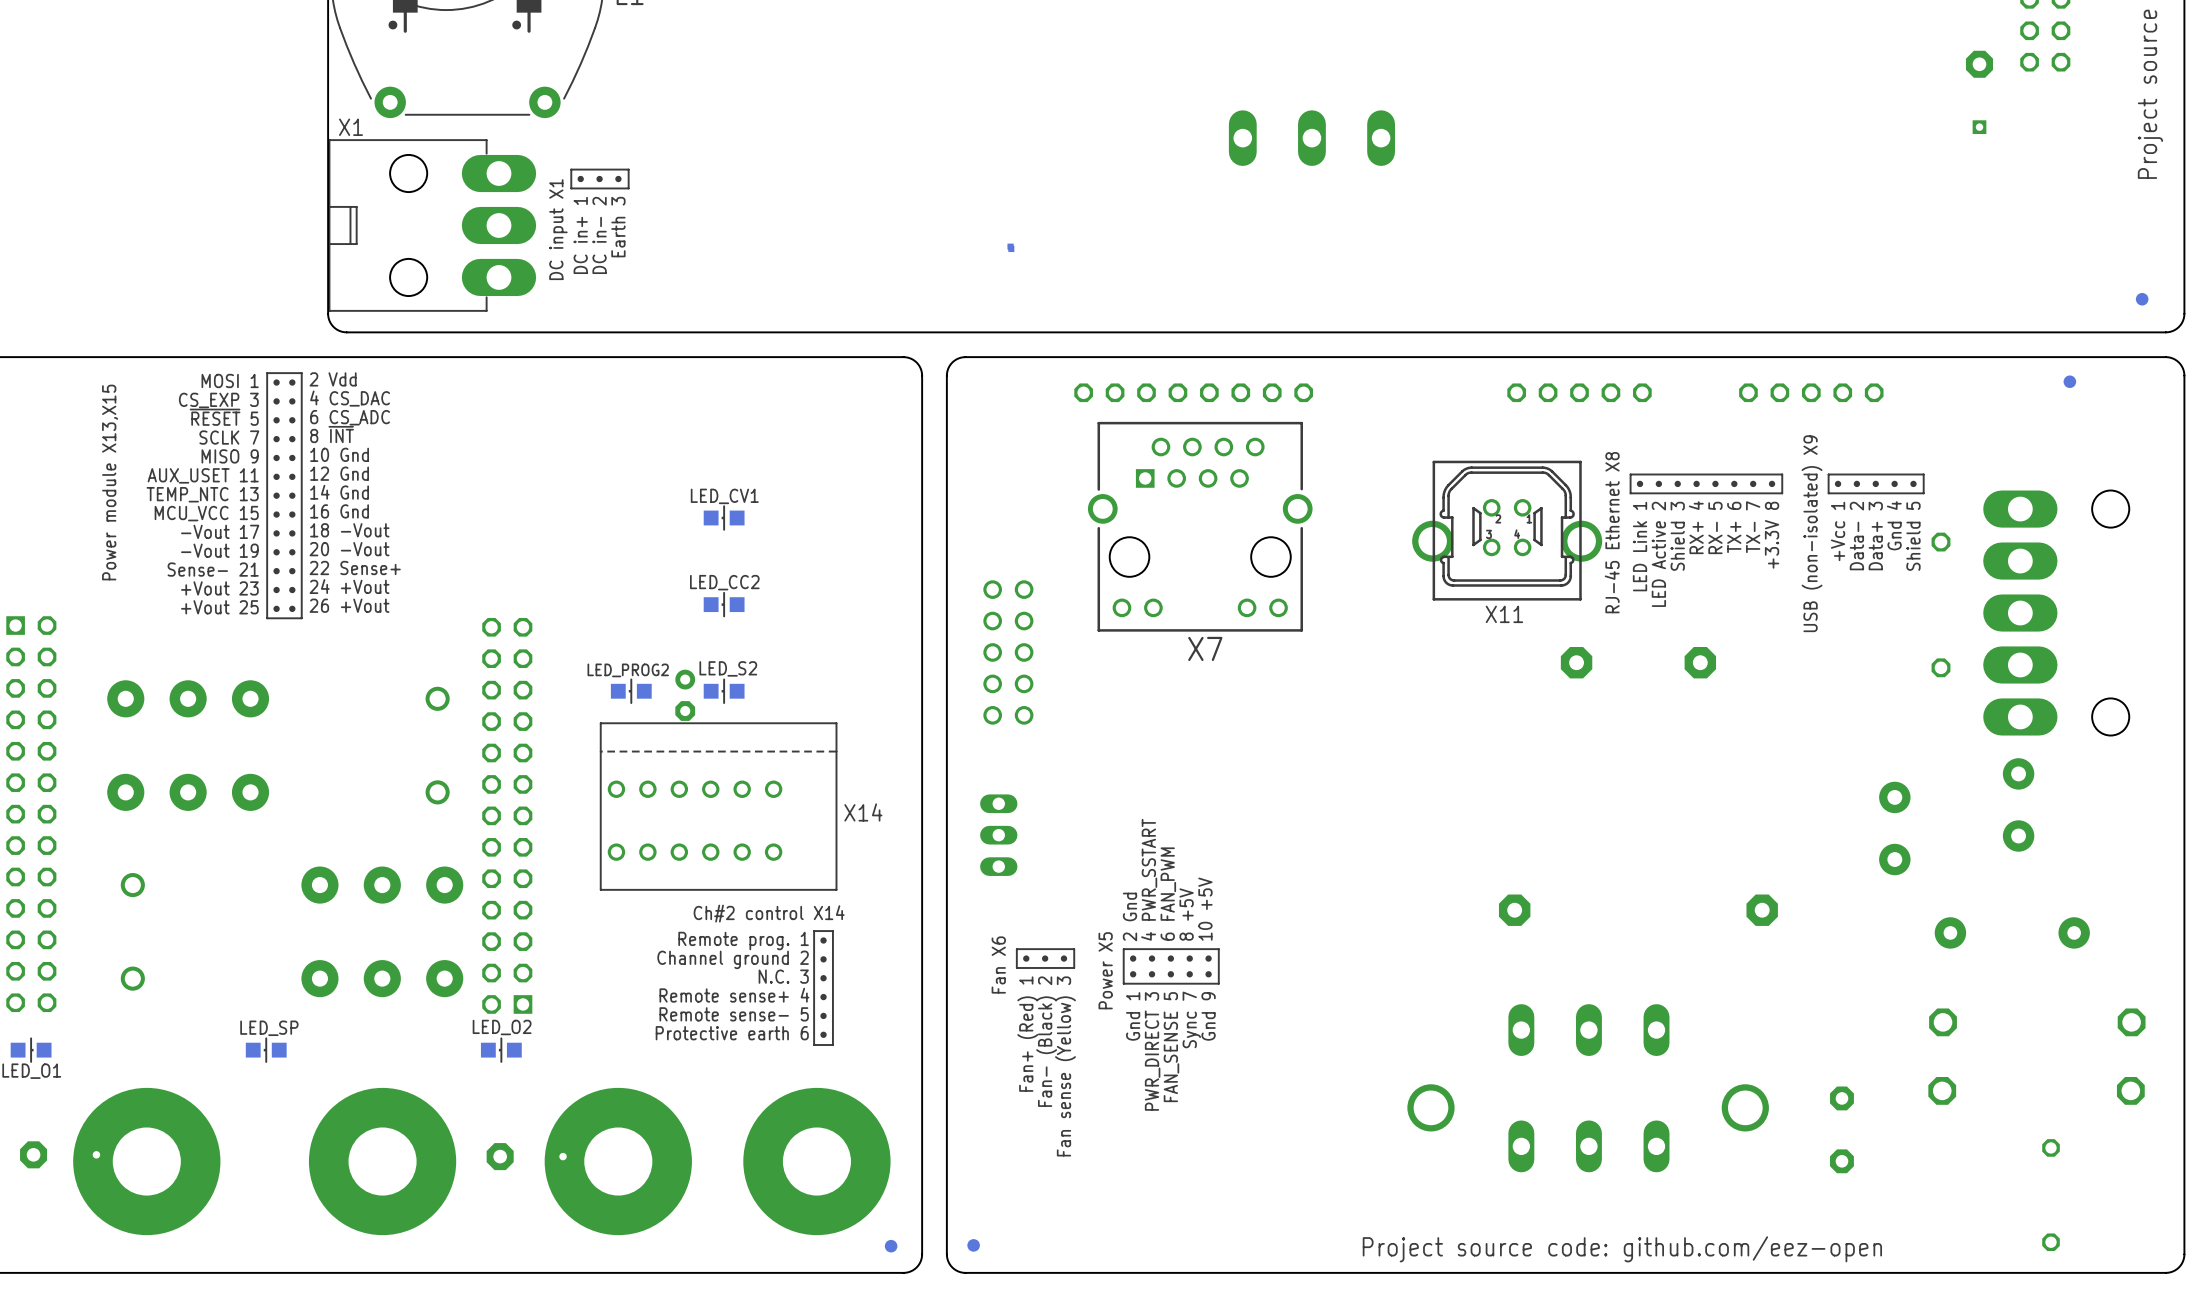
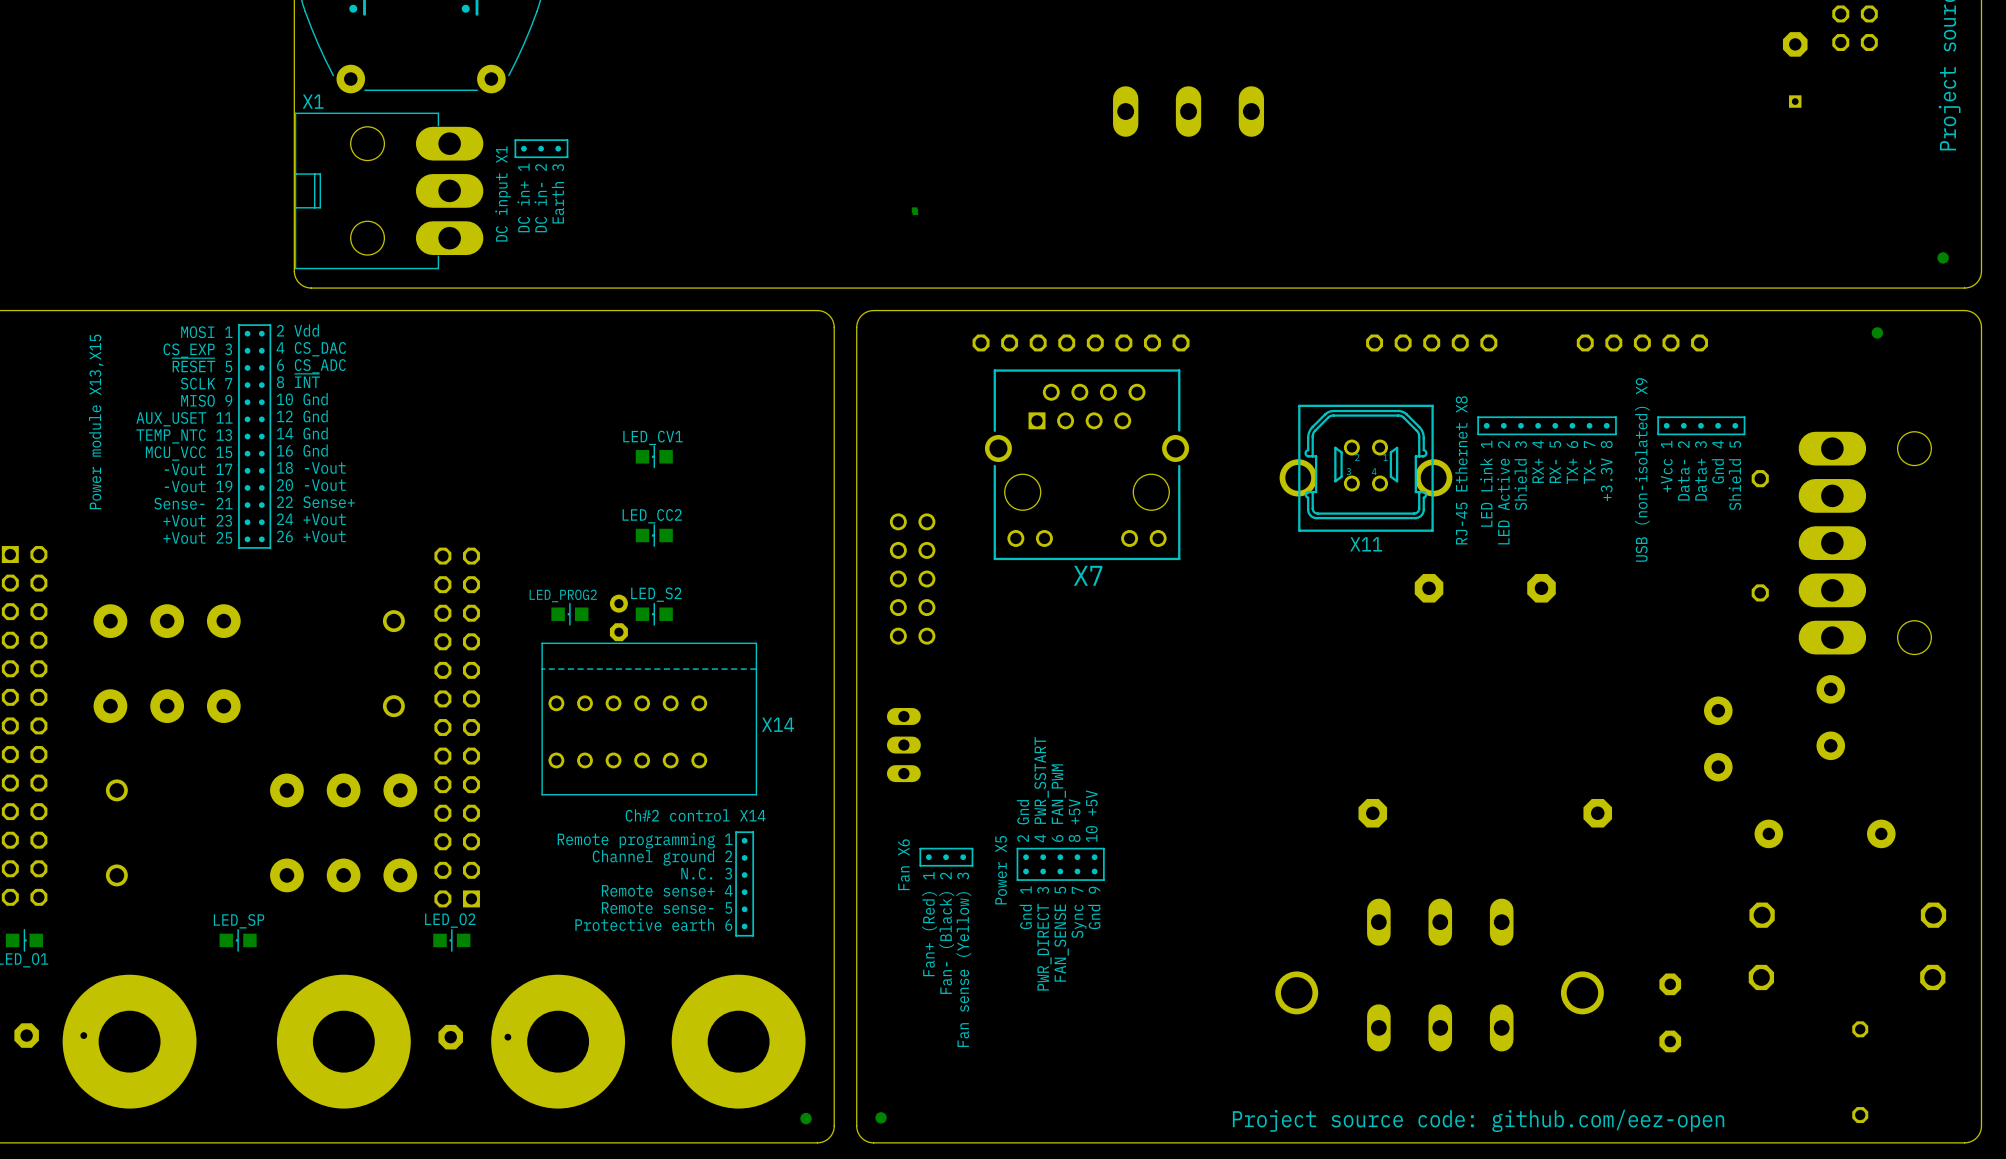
text: Remote prog. 1 (743, 941) -> Remote programming 1 (645, 840)

